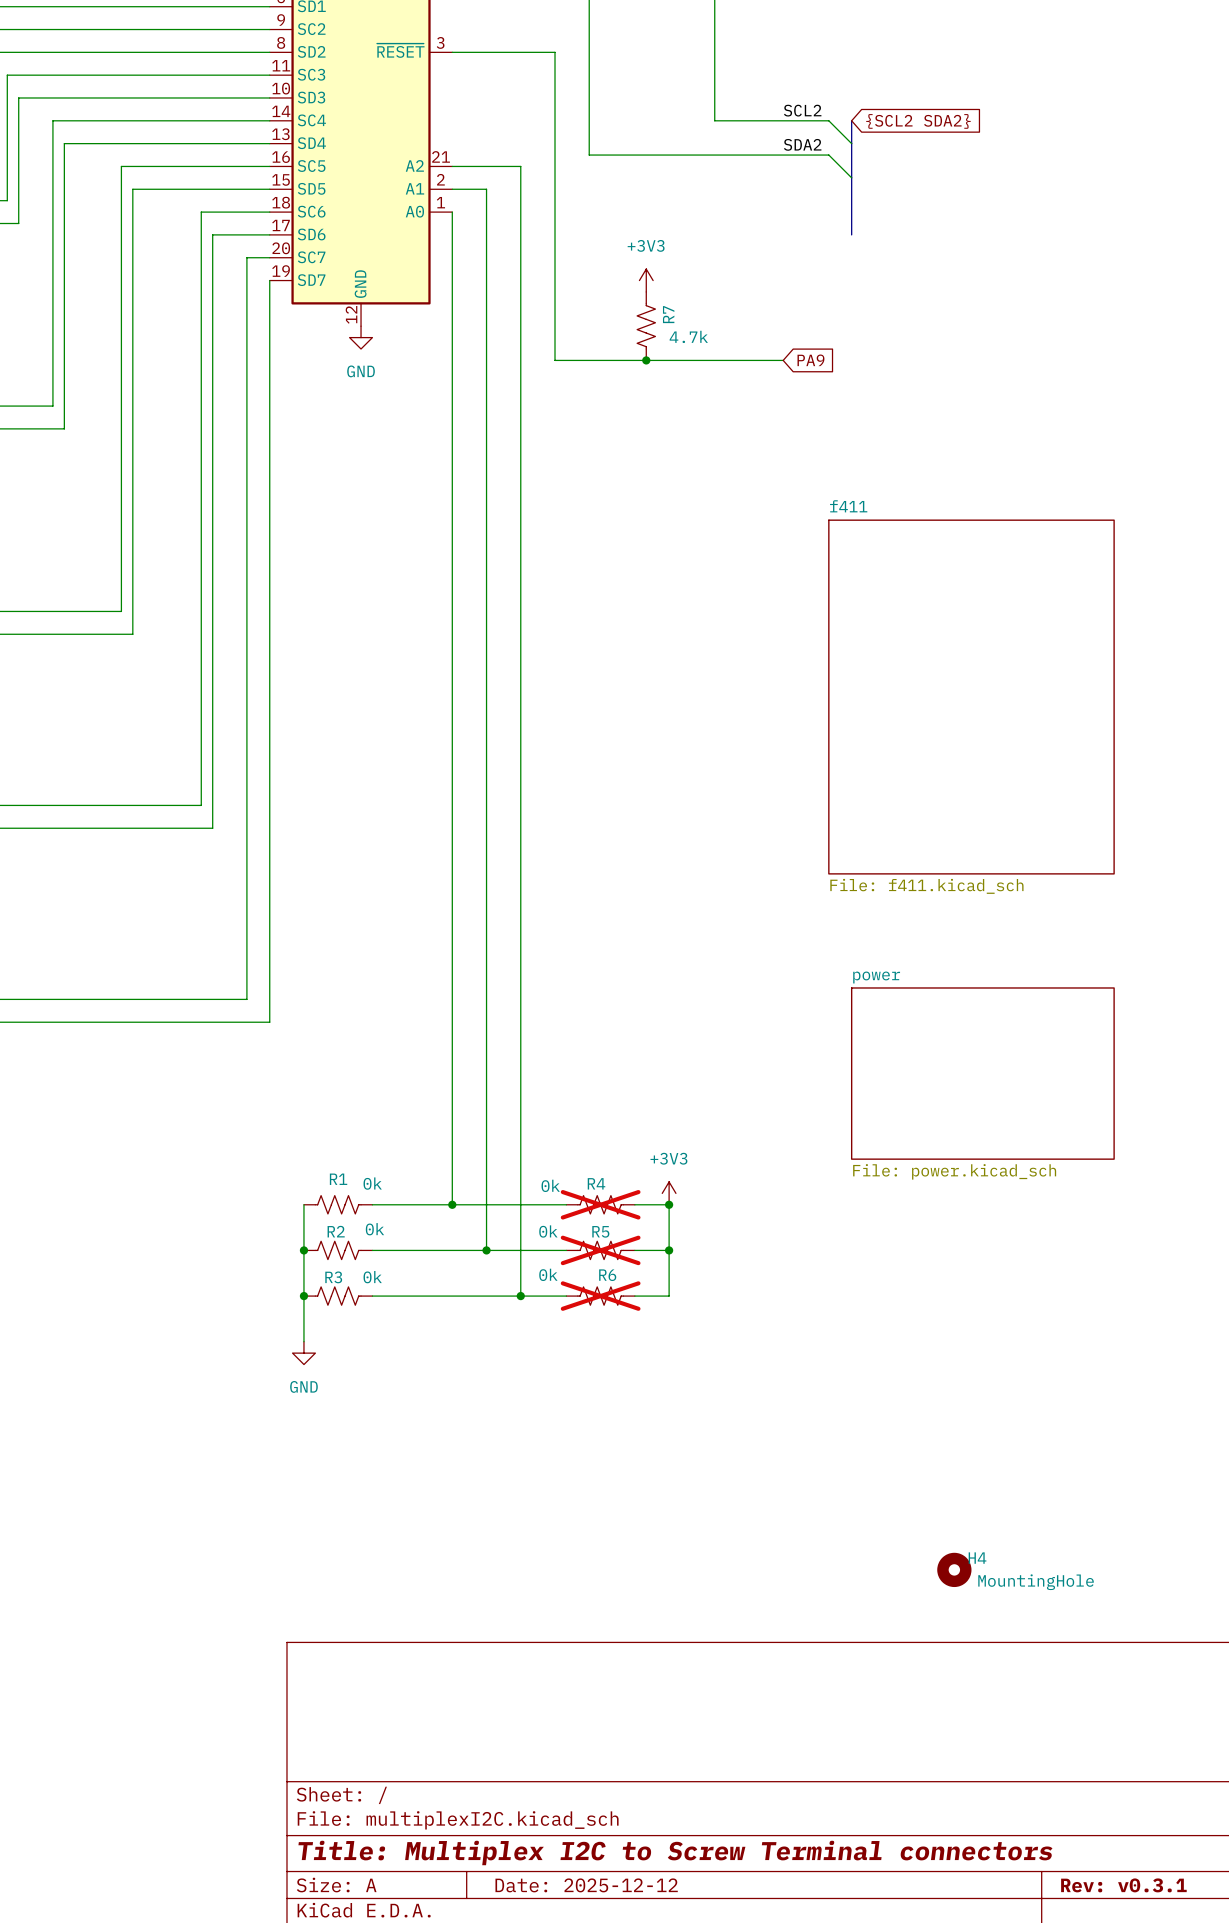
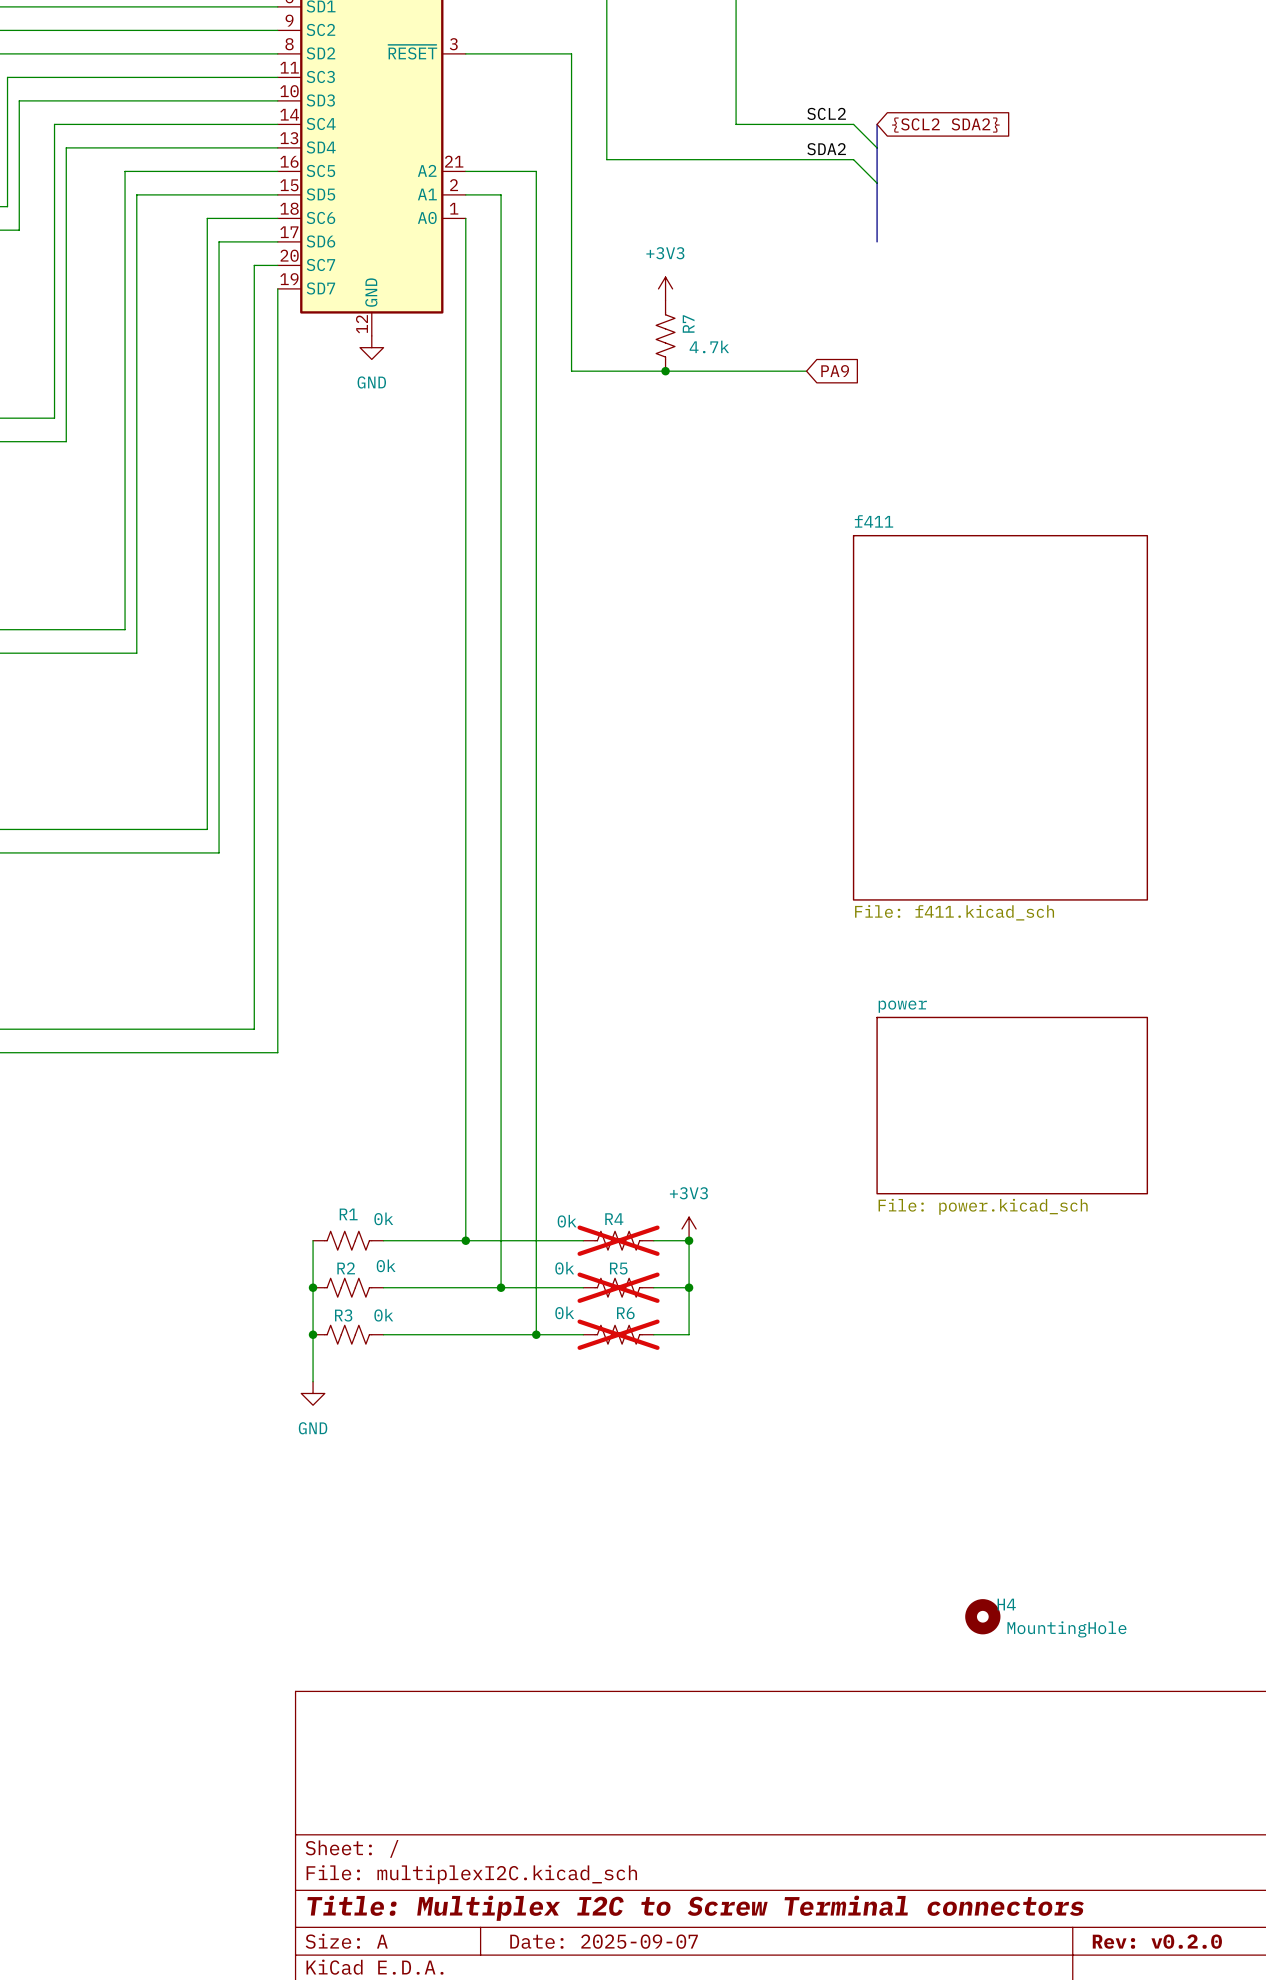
title block: Date: 2025-12-12 (586, 1885) -> Date: 2025-09-07 (604, 1941)
title block: Rev: v0.3.1 (1123, 1885) -> Rev: v0.2.0 (1157, 1941)

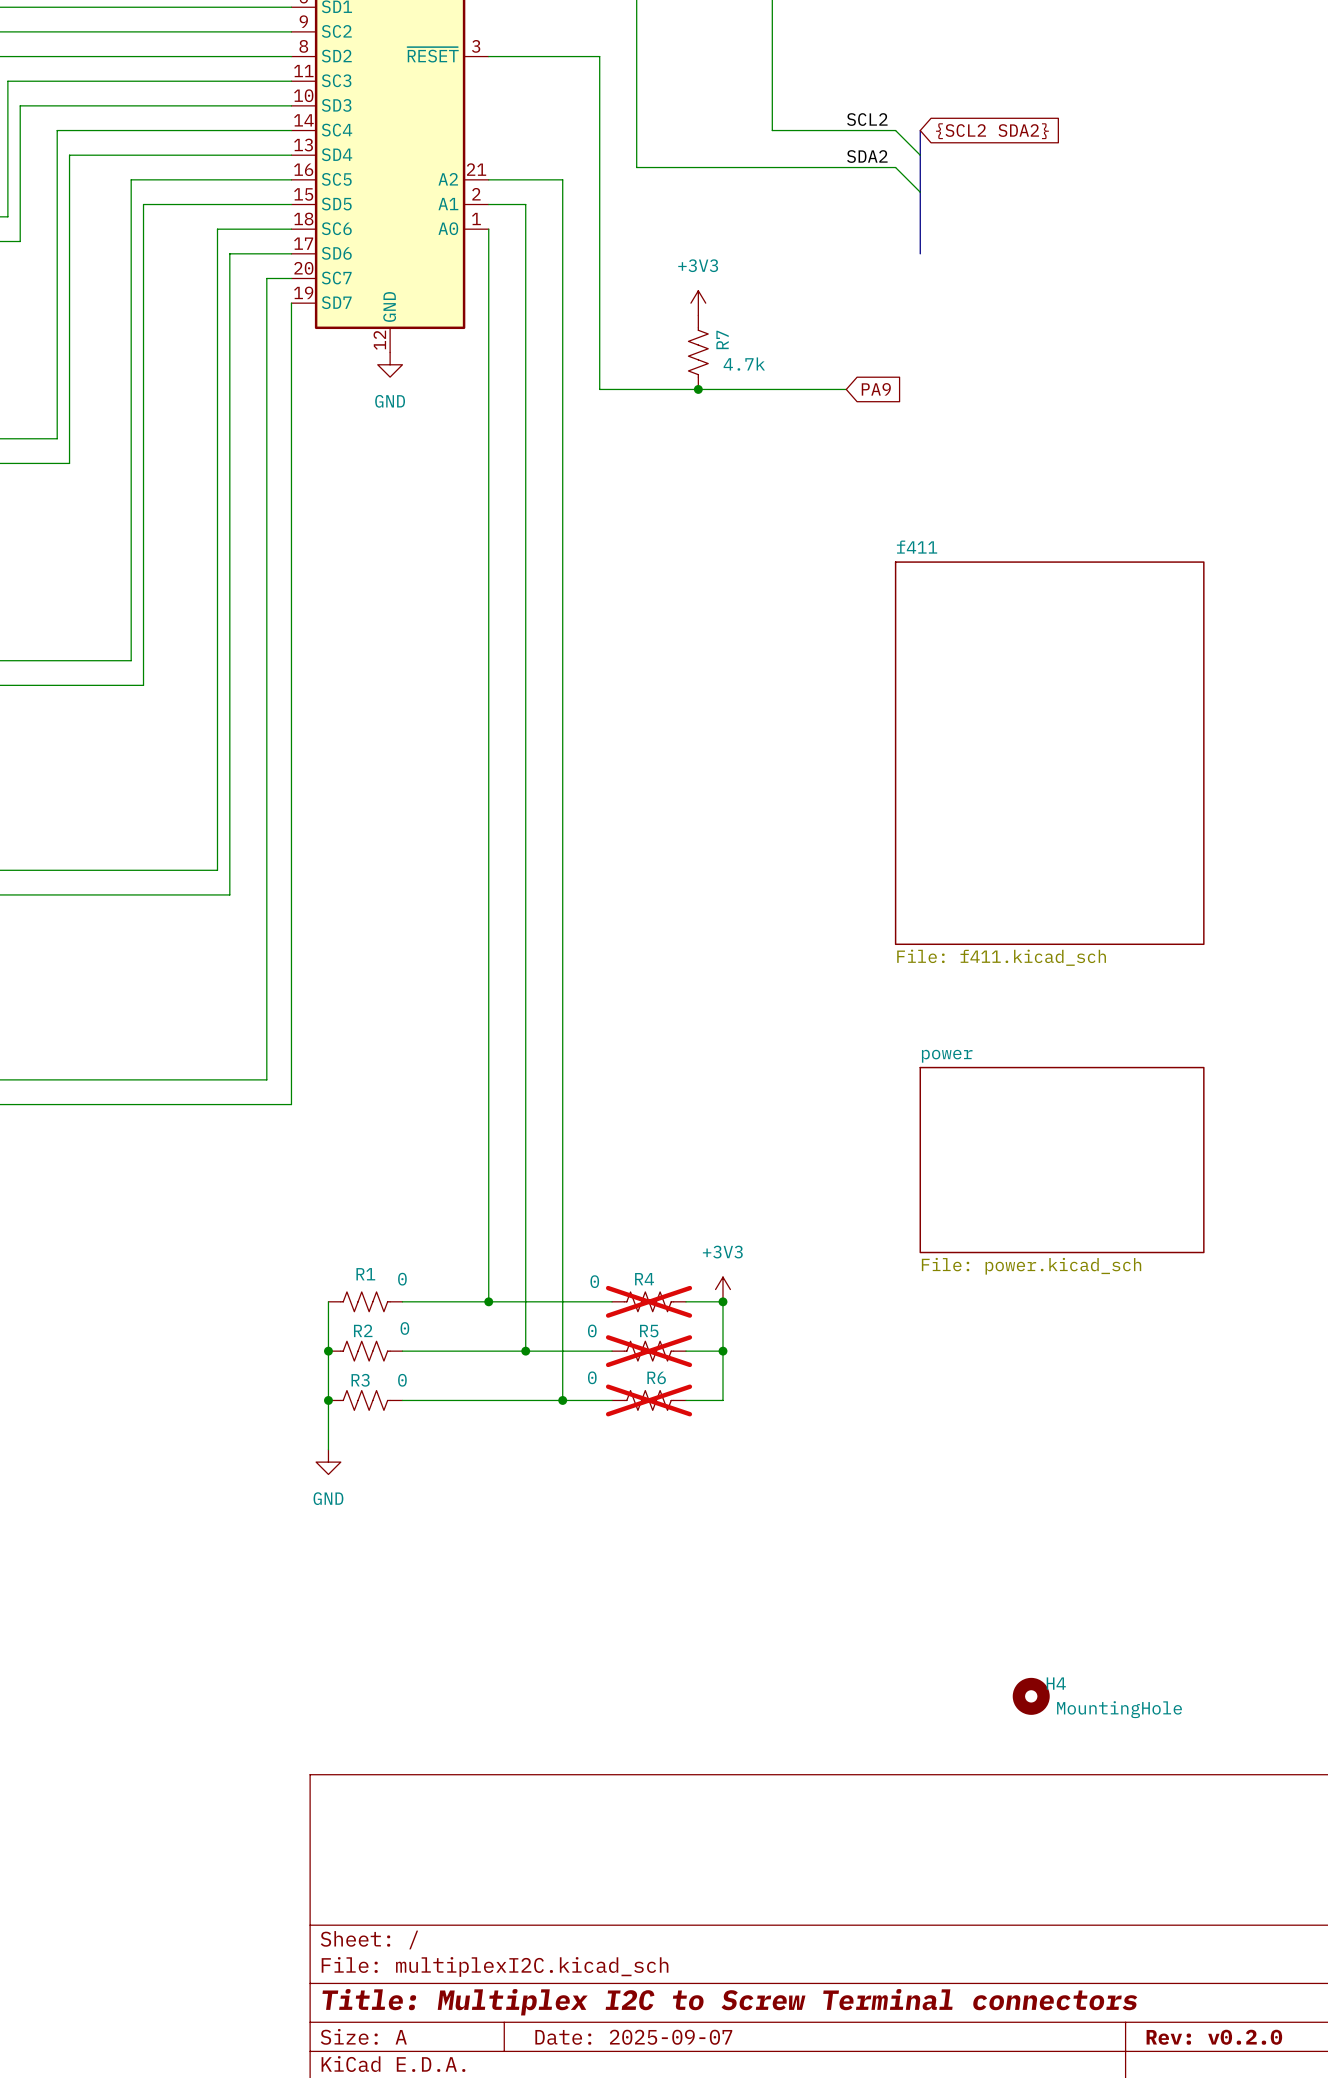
R1 value: 0k (383, 1218) -> 0 (402, 1279)
R4 value: 0k (567, 1221) -> 0 (594, 1281)
R2 value: 0k (386, 1265) -> 0 (404, 1328)
R5 value: 0k (564, 1268) -> 0 (592, 1330)
R6 value: 0k (564, 1312) -> 0 (592, 1377)
R3 value: 0k (383, 1315) -> 0 (402, 1380)

